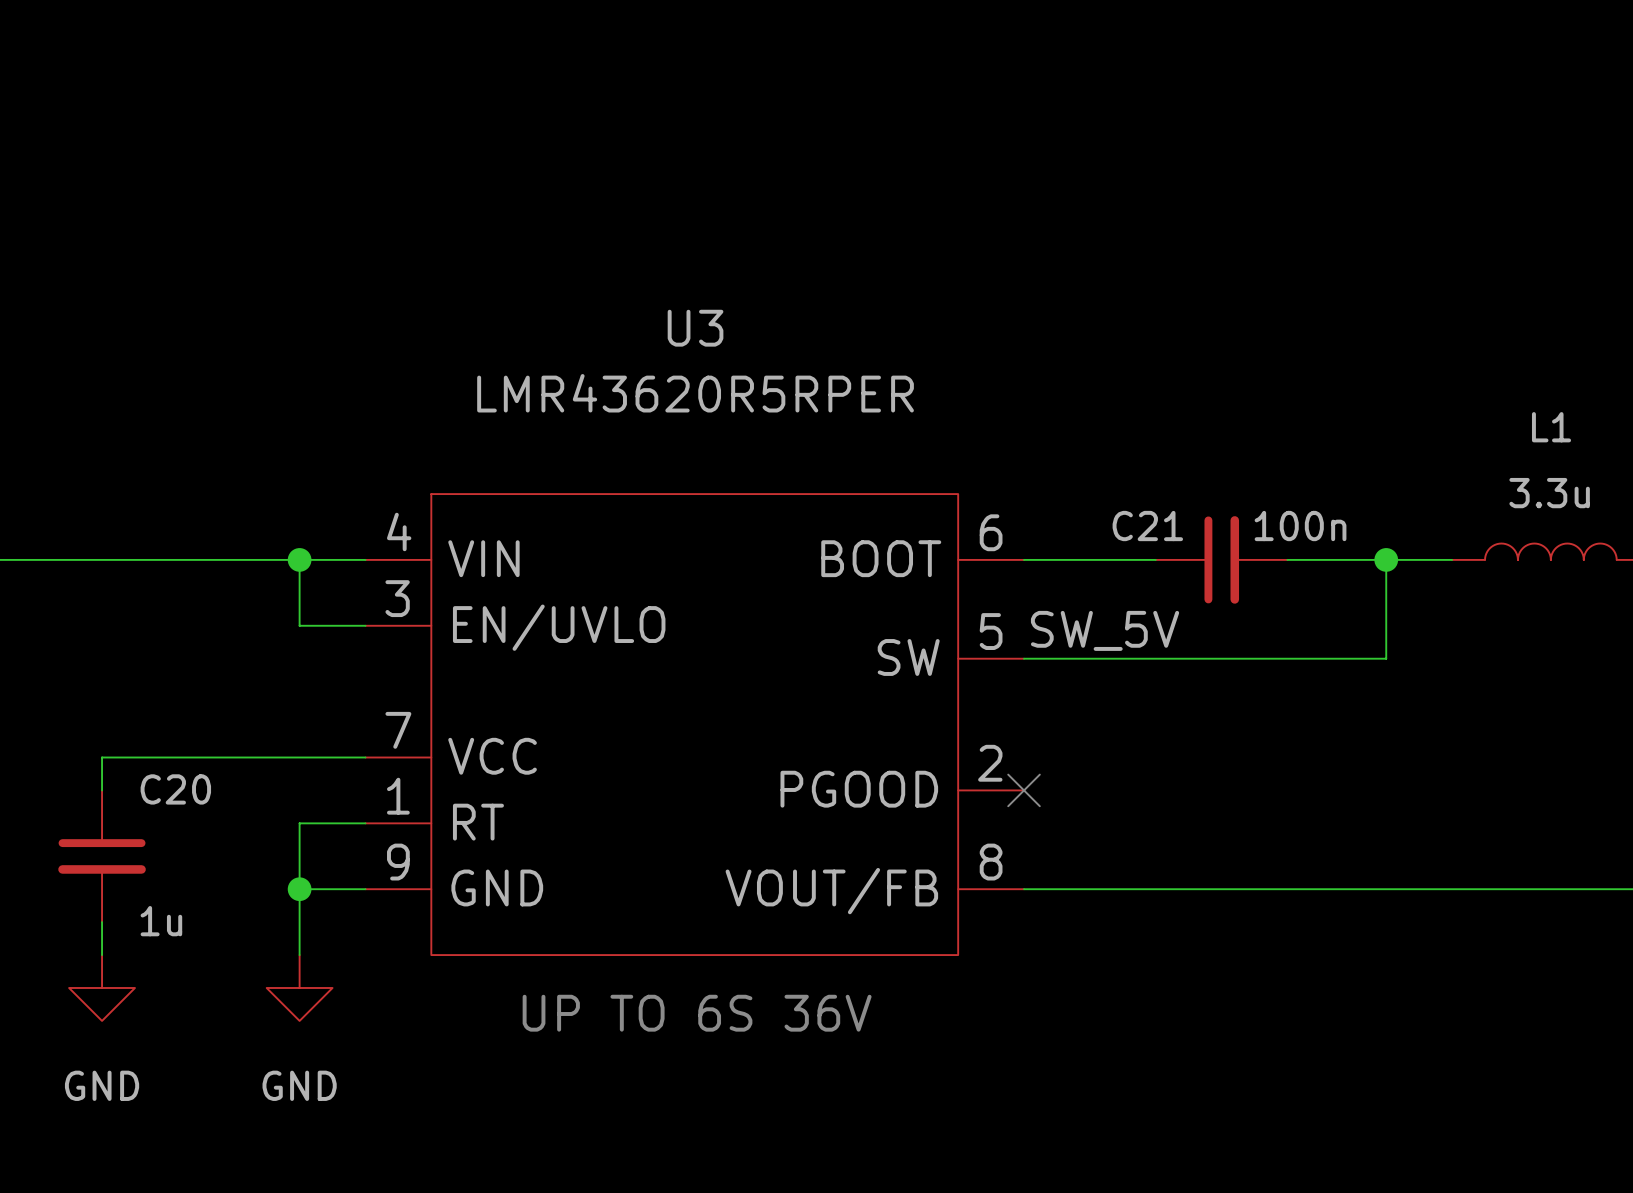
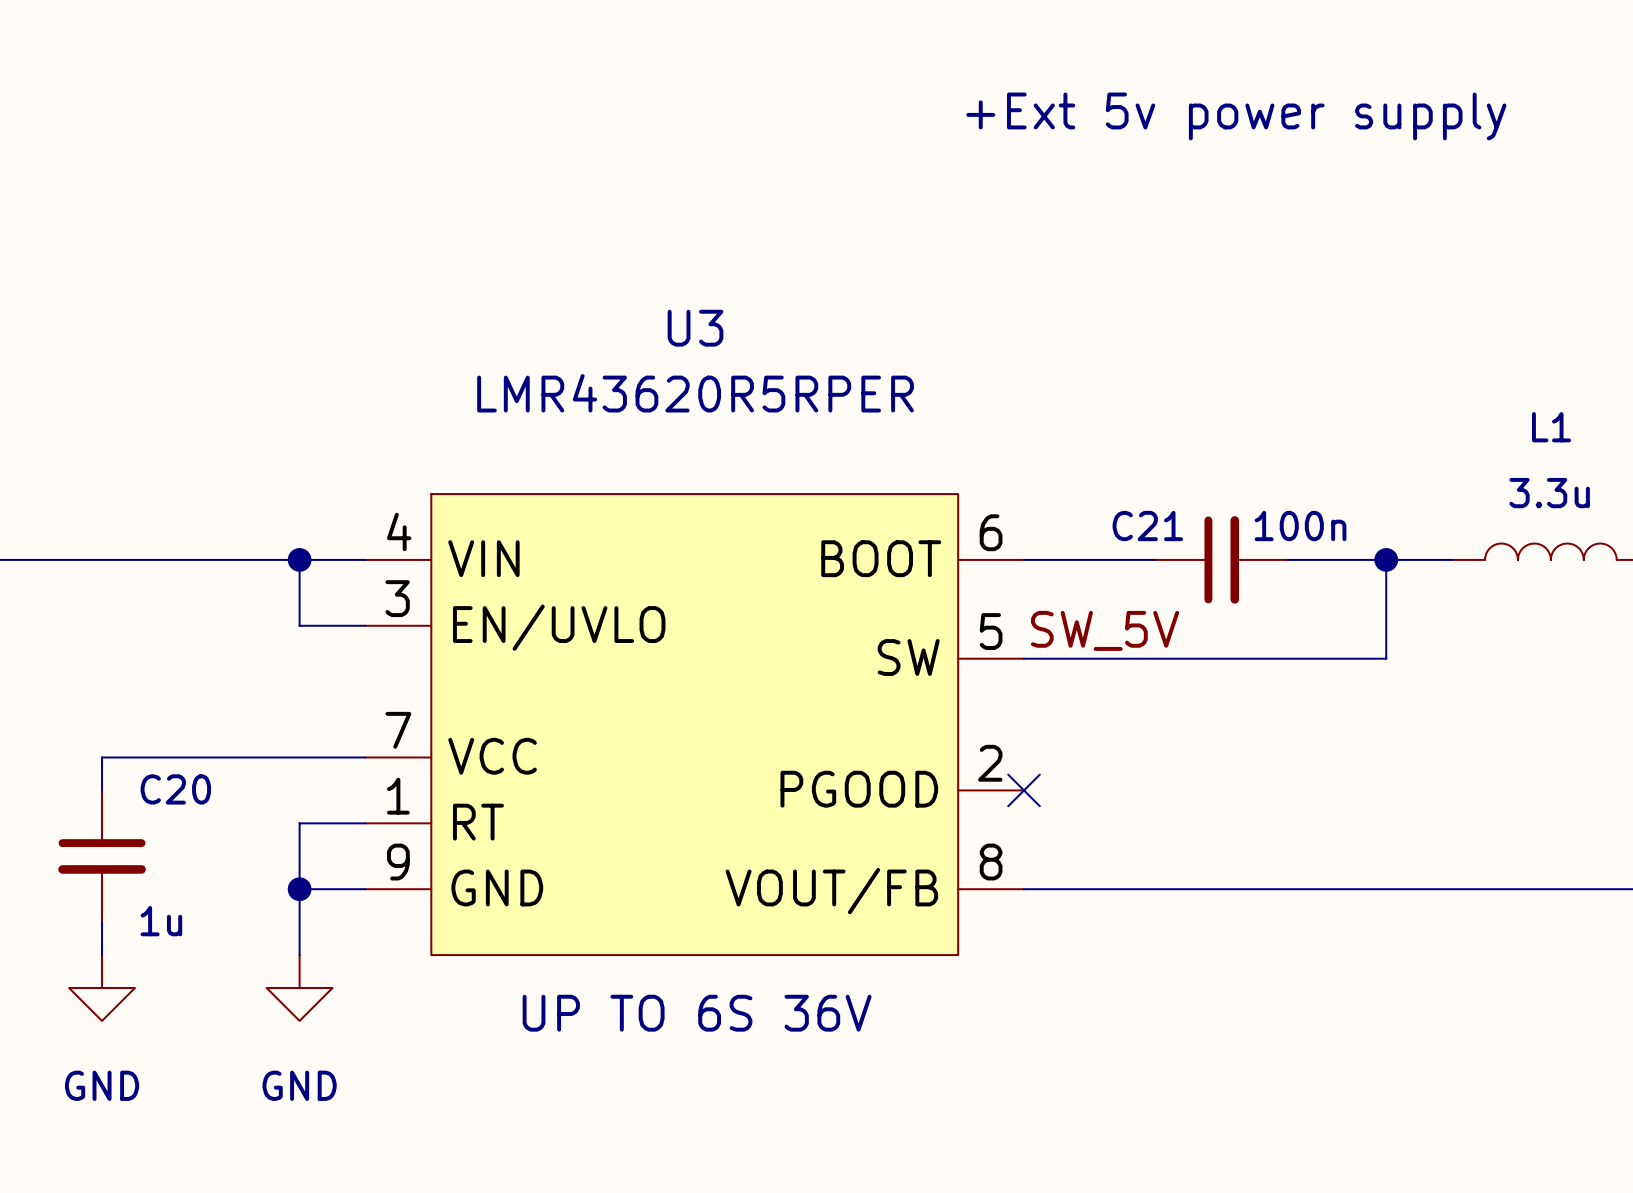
text: none -> +Ext 5v power supply (1236, 116)

